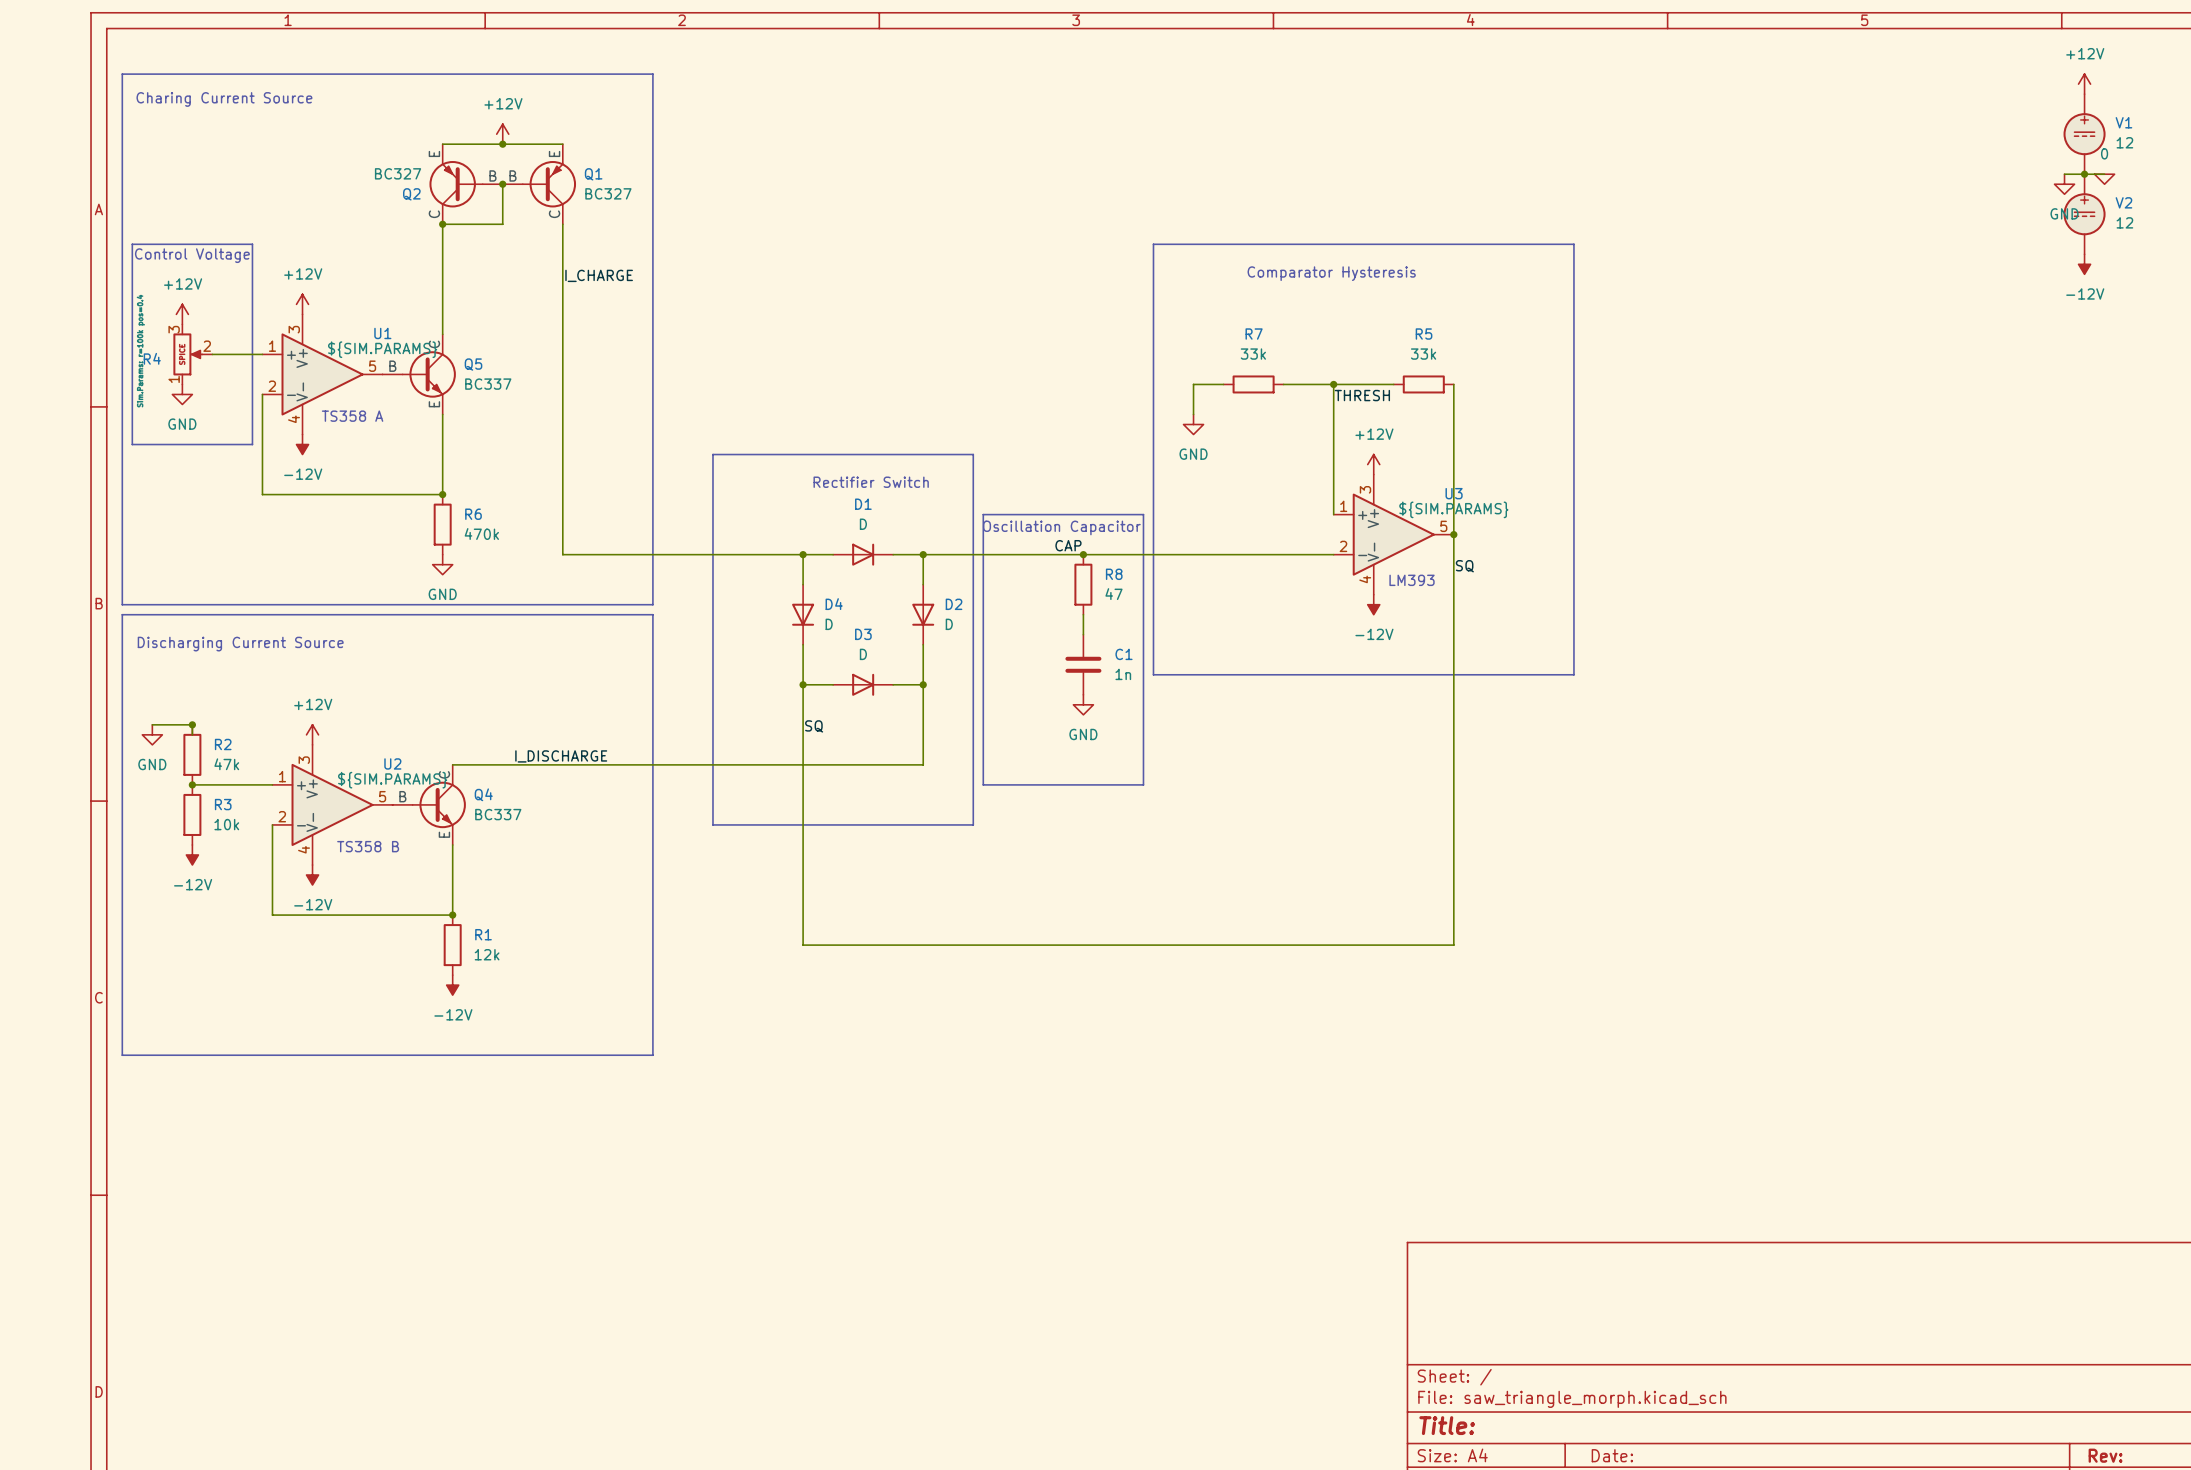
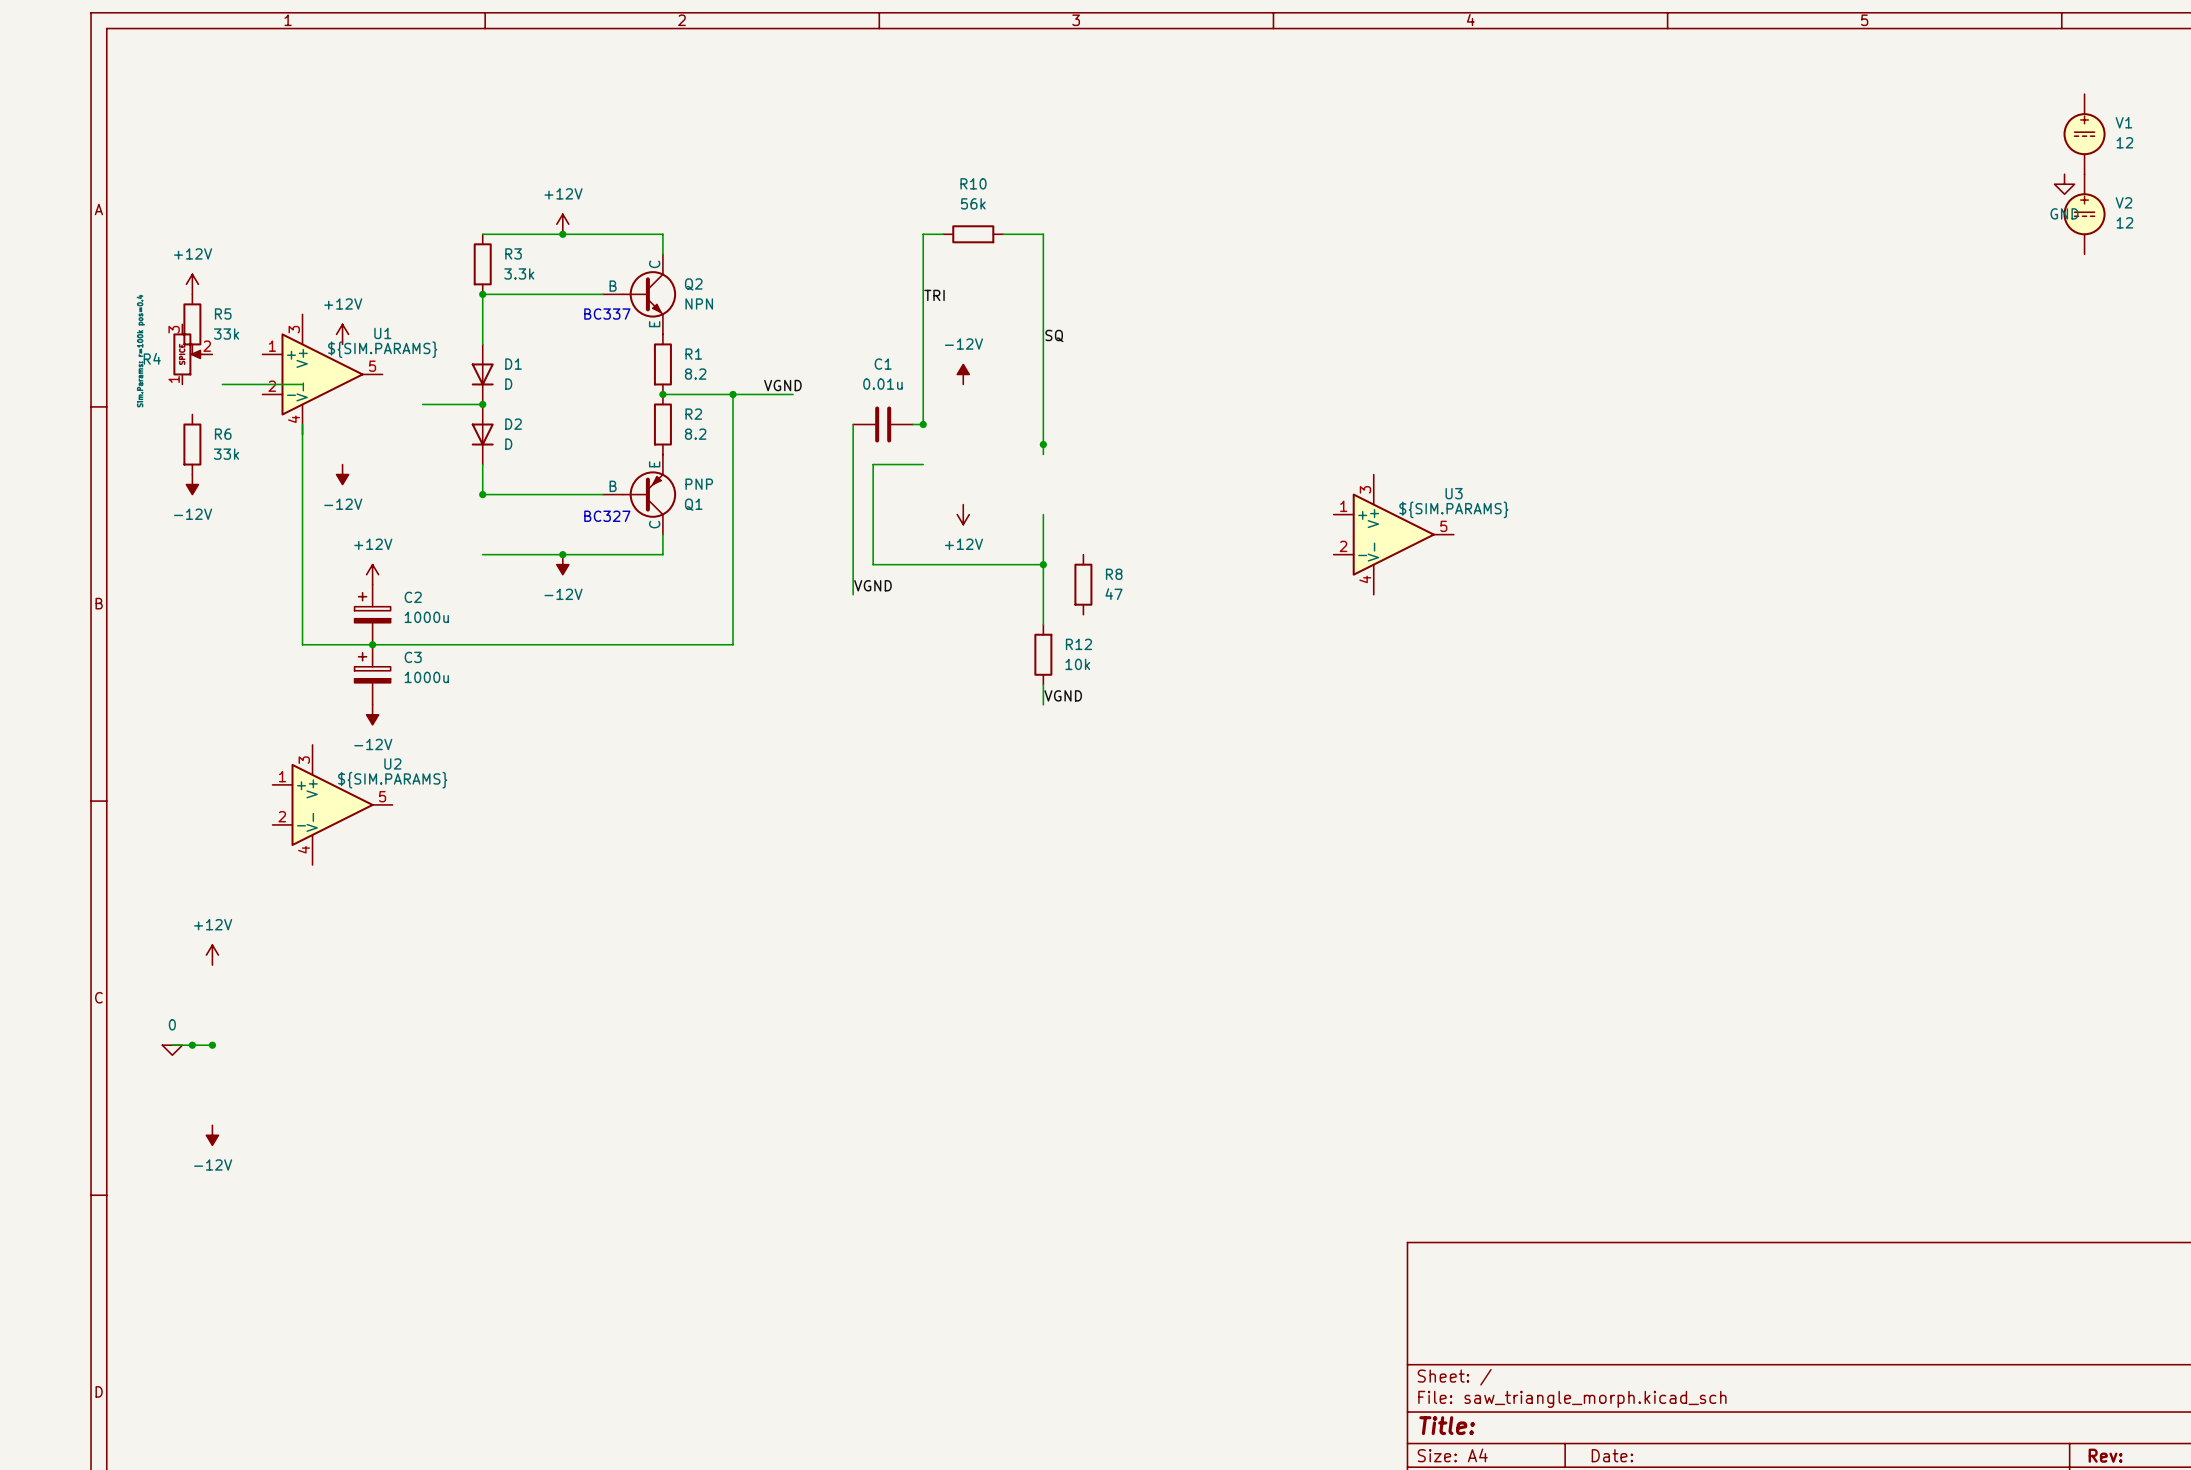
line: (122, 74) (122, 604) (652, 604) (652, 74) (122, 74) -> none
power symbol: +12V (2084, 84) -> none
text: Charing Current Source (224, 99) -> none
power symbol position: +12V (502, 134) -> +12V (562, 224)
Q2 symbol: [429, 144, 503, 225] -> [602, 254, 677, 335]
wire: (442, 144) (562, 144) -> none
junction: (502, 144) -> none
Q2 value: BC327 (398, 173) -> NPN (699, 303)
Q1 name position: Q1 (593, 174) -> Q1 (693, 504)
wire: (2064, 174) (2104, 174) -> none
junction: (2084, 174) -> none
power symbol: 0 (2104, 179) -> none
wire: (502, 184) (502, 224) (442, 224) (442, 334) -> none
junction: (502, 184) -> none
Q1 position: (539, 184) -> (639, 494)
Q1 value: BC327 (608, 193) -> PNP (699, 484)
Q2 name position: Q2 (411, 194) -> Q2 (693, 284)
junction: (442, 224) -> none
wire: (562, 224) (562, 554) -> (482, 554) (562, 554)
wire: none -> (482, 234) (662, 234) (662, 254)
junction: none -> (562, 234)
wire: none -> (943, 234) (923, 234) (923, 424) (913, 424)
R10: none -> 56k (973, 234)
wire: none -> (1003, 234) (1043, 234) (1043, 454)
line: (132, 244) (252, 244) (252, 444) (132, 444) (132, 244) -> none
line: (1153, 244) (1573, 244) (1573, 674) (1153, 674) (1153, 244) -> none
text: Control Voltage (192, 255) -> none
power symbol: -12V (2084, 264) -> none
text: Comparator Hysteresis (1331, 273) -> none
label: I_CHARGE (599, 275) -> none
junction: none -> (482, 294)
wire: none -> (602, 294) (482, 294) (482, 344)
label: none -> TRI (934, 295)
power symbol position: +12V (302, 304) -> +12V (342, 334)
power symbol position: +12V (182, 314) -> +12V (192, 284)
text: none -> BC337 (607, 314)
R5 name position: R5 (1424, 334) -> R5 (223, 314)
label: none -> SQ (1054, 335)
wire: (212, 354) (262, 354) -> none
Q5: BC337 (419, 374) -> none
power symbol: none -> -12V (963, 374)
wire: none -> (222, 384) (302, 384)
wire: (1223, 384) (1193, 384) (1193, 414) -> none
R7: 33k (1253, 384) -> none
wire: (1283, 384) (1393, 384) -> none
wire: (1333, 384) (1333, 514) -> none
junction: (1333, 384) -> none
R5 rotation: 0° (1423, 384) -> 90° clockwise (192, 324)
R5 position: (1423, 384) -> (192, 324)
wire: (1453, 384) (1453, 945) (803, 945) (803, 644) -> none
label: none -> VGND (782, 385)
power symbol: GND (182, 394) -> none
wire: (262, 394) (262, 494) (442, 494) (442, 414) -> none
wire: none -> (662, 394) (793, 394)
junction: none -> (662, 394)
wire: none -> (733, 394) (733, 644) (302, 644) (302, 424)
junction: none -> (733, 394)
label: THRESH (1362, 395) -> none
wire: none -> (422, 404) (482, 404)
junction: none -> (482, 404)
text: TS358 A (352, 416) -> none
wire: none -> (853, 424) (853, 594)
junction: none -> (923, 424)
power symbol: GND (1193, 424) -> none
power symbol position: -12V (302, 444) -> -12V (342, 474)
junction: none -> (1043, 444)
line: (712, 454) (973, 454) (973, 824) (712, 824) (712, 454) -> none
wire: none -> (482, 464) (482, 494) (602, 494)
wire: none -> (923, 464) (873, 464) (873, 564) (1043, 564)
power symbol: +12V (1373, 464) -> none
text: Rectifier Switch (871, 482) -> none
power symbol: none -> -12V (192, 484)
junction position: (442, 494) -> (482, 494)
D1 name position: D1 (863, 504) -> D1 (513, 364)
power symbol: none -> +12V (963, 514)
line: (983, 514) (1143, 514) (1143, 784) (983, 784) (983, 514) -> none
wire: none -> (1043, 514) (1043, 624)
text: none -> BC327 (607, 516)
R6 position: (442, 524) -> (192, 444)
text: Oscillation Capacitor (1061, 527) -> none
R6 value: 470k (481, 534) -> 33k (226, 454)
junction: (1453, 534) -> none
label: CAP (1068, 545) -> none
junction: none -> (562, 554)
wire: (662, 554) (833, 554) -> (662, 554) (662, 534)
wire: (803, 554) (803, 584) -> none
junction: (803, 554) -> none
D1 rotation: 0° (863, 554) -> 90° clockwise (482, 374)
D1 position: (863, 554) -> (482, 374)
wire: (893, 554) (1333, 554) -> none
wire: (923, 554) (923, 584) -> none
junction: (923, 554) -> none
junction position: (1083, 554) -> (1043, 564)
power symbol: GND (442, 564) -> none
power symbol: none -> -12V (562, 564)
label: SQ (1464, 566) -> none
power symbol: none -> +12V (372, 574)
text: LM393 (1412, 580) -> none
label: none -> VGND (873, 585)
power symbol: -12V (1373, 604) -> none
line: (122, 614) (652, 614) (652, 1055) (122, 1055) (122, 614) -> none
C2: none -> 1000u (372, 614)
D4: D (803, 614) -> none
D2 position: (923, 614) -> (482, 434)
wire: (1083, 614) (1083, 634) -> (1043, 684) (1043, 704)
text: Discharging Current Source (240, 644) -> none
junction: none -> (372, 644)
wire: (923, 644) (923, 764) (452, 764) -> none
R12: none -> 10k (1043, 654)
C1 name position: C1 (1124, 654) -> C1 (883, 364)
C1 rotation: 0° (1083, 664) -> 90° clockwise (883, 424)
C1 position: (1083, 664) -> (883, 424)
C3: none -> 1000u (372, 674)
C1 value: 1n (1123, 674) -> 0.01u (882, 384)
wire: (803, 684) (833, 684) -> none
junction: (803, 684) -> none
D3: D (863, 684) -> none
wire: (893, 684) (923, 684) -> none
junction: (923, 684) -> none
label: none -> VGND (1063, 695)
power symbol: GND (1083, 704) -> none
power symbol: none -> -12V (372, 714)
wire: (152, 724) (192, 724) (192, 734) -> none
junction: (192, 724) -> none
label: SQ (814, 726) -> none
power symbol: GND (152, 734) -> none
power symbol: +12V (312, 734) -> none
R2 position: (192, 754) -> (662, 424)
label: I_DISCHARGE (561, 756) -> none
R2 value: 47k (226, 764) -> 8.2 (695, 434)
wire: (192, 784) (272, 784) -> none
junction: (192, 784) -> none
Q4: BC337 (429, 804) -> none
R3 position: (192, 814) -> (482, 264)
R3 value: 10k (226, 824) -> 3.3k (519, 273)
wire: (272, 824) (272, 915) (452, 915) (452, 844) -> none
text: TS358 B (368, 846) -> none
power symbol: -12V (192, 854) -> none
power symbol: -12V (312, 875) -> none
junction: (452, 915) -> none
R1 position: (452, 945) -> (662, 364)
R1 value: 12k (487, 954) -> 8.2 (695, 374)
power symbol: none -> +12V (212, 955)
power symbol: -12V (452, 985) -> none
wire: none -> (172, 1045) (212, 1045)
junction: none -> (192, 1045)
junction: none -> (212, 1045)
power symbol: none -> 0 (172, 1050)
power symbol: none -> -12V (212, 1135)

